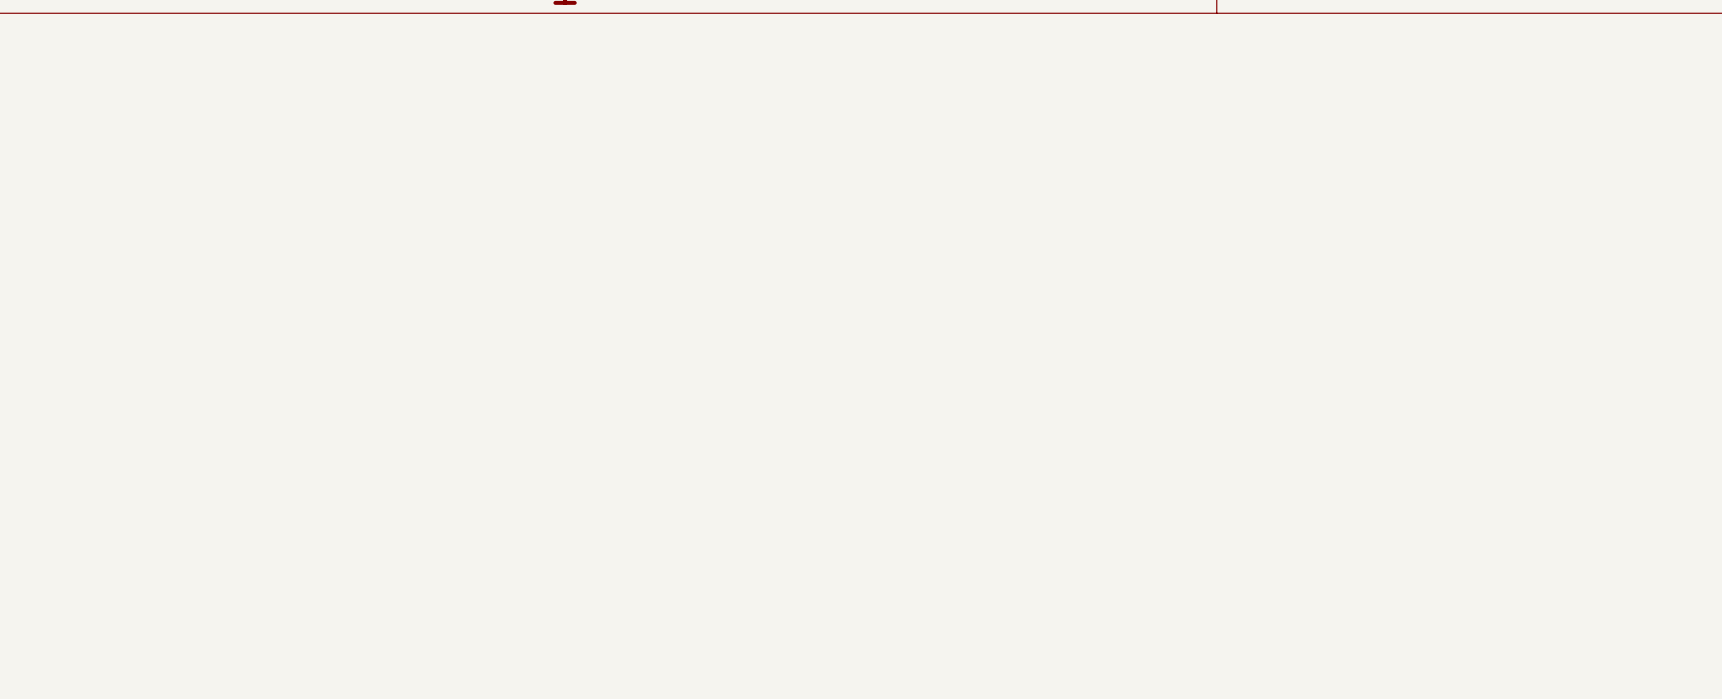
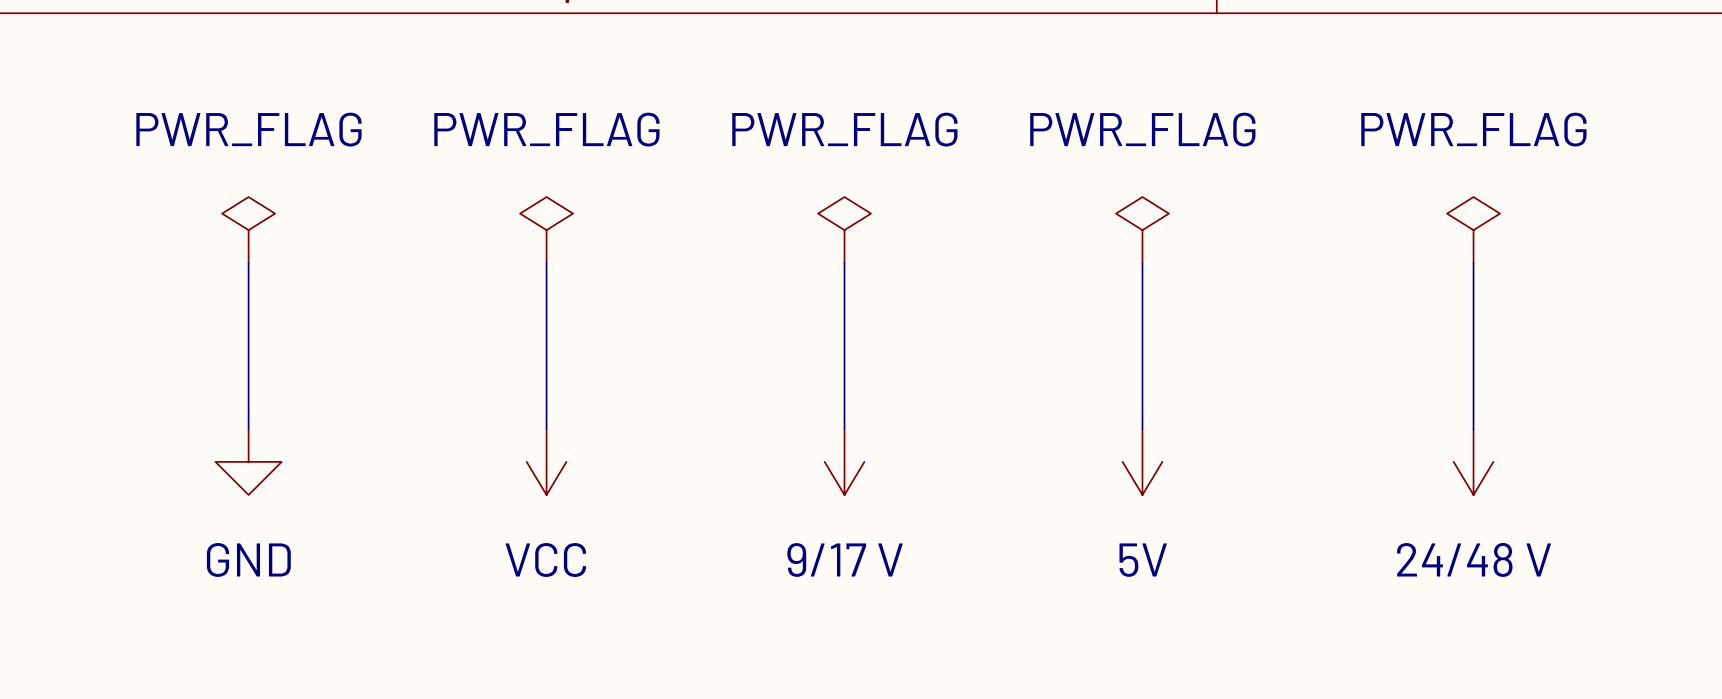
power symbol: none -> PWR_FLAG (248, 230)
power symbol: none -> PWR_FLAG (546, 230)
power symbol: none -> PWR_FLAG (844, 230)
power symbol: none -> PWR_FLAG (1142, 230)
power symbol: none -> PWR_FLAG (1473, 230)
wire: none -> (248, 263) (248, 428)
wire: none -> (546, 263) (546, 428)
wire: none -> (844, 263) (844, 428)
wire: none -> (1142, 263) (1142, 428)
wire: none -> (1473, 263) (1473, 428)
power symbol: none -> GND (248, 461)
power symbol: none -> VCC (546, 461)
power symbol: none -> 9/17 V (844, 461)
power symbol: none -> 5V (1142, 461)
power symbol: none -> 24/48 V (1473, 461)

